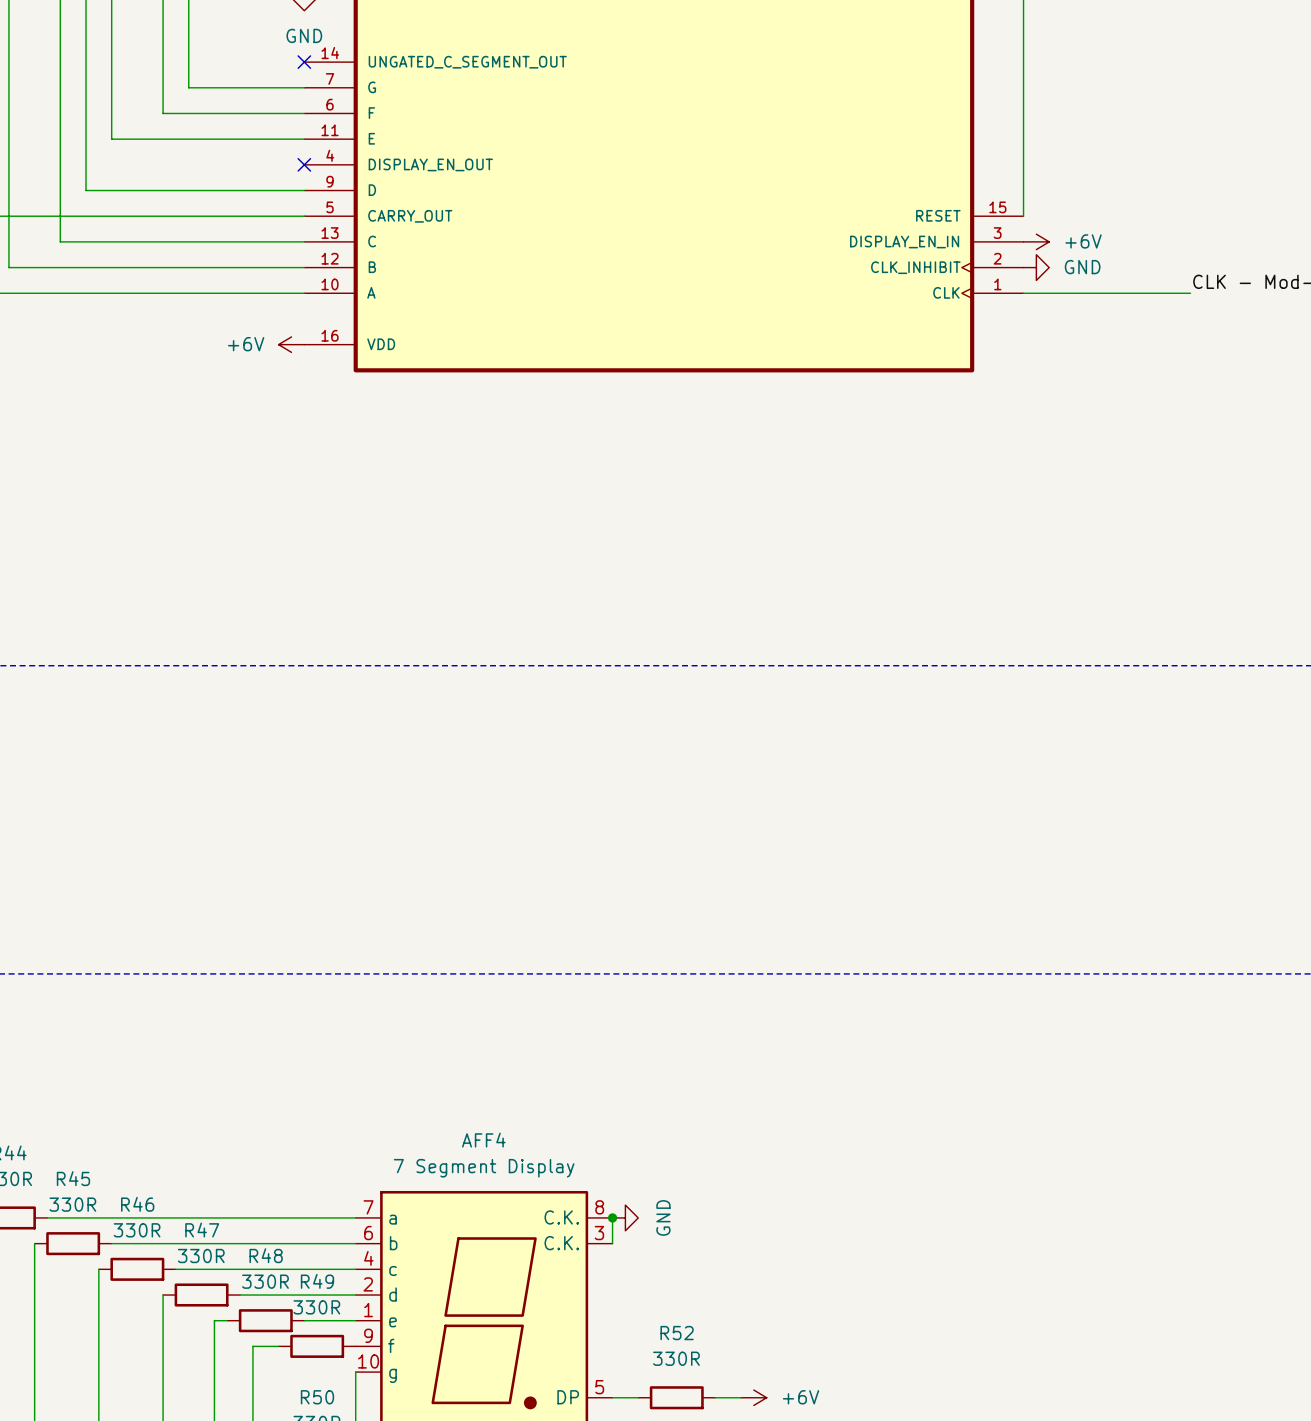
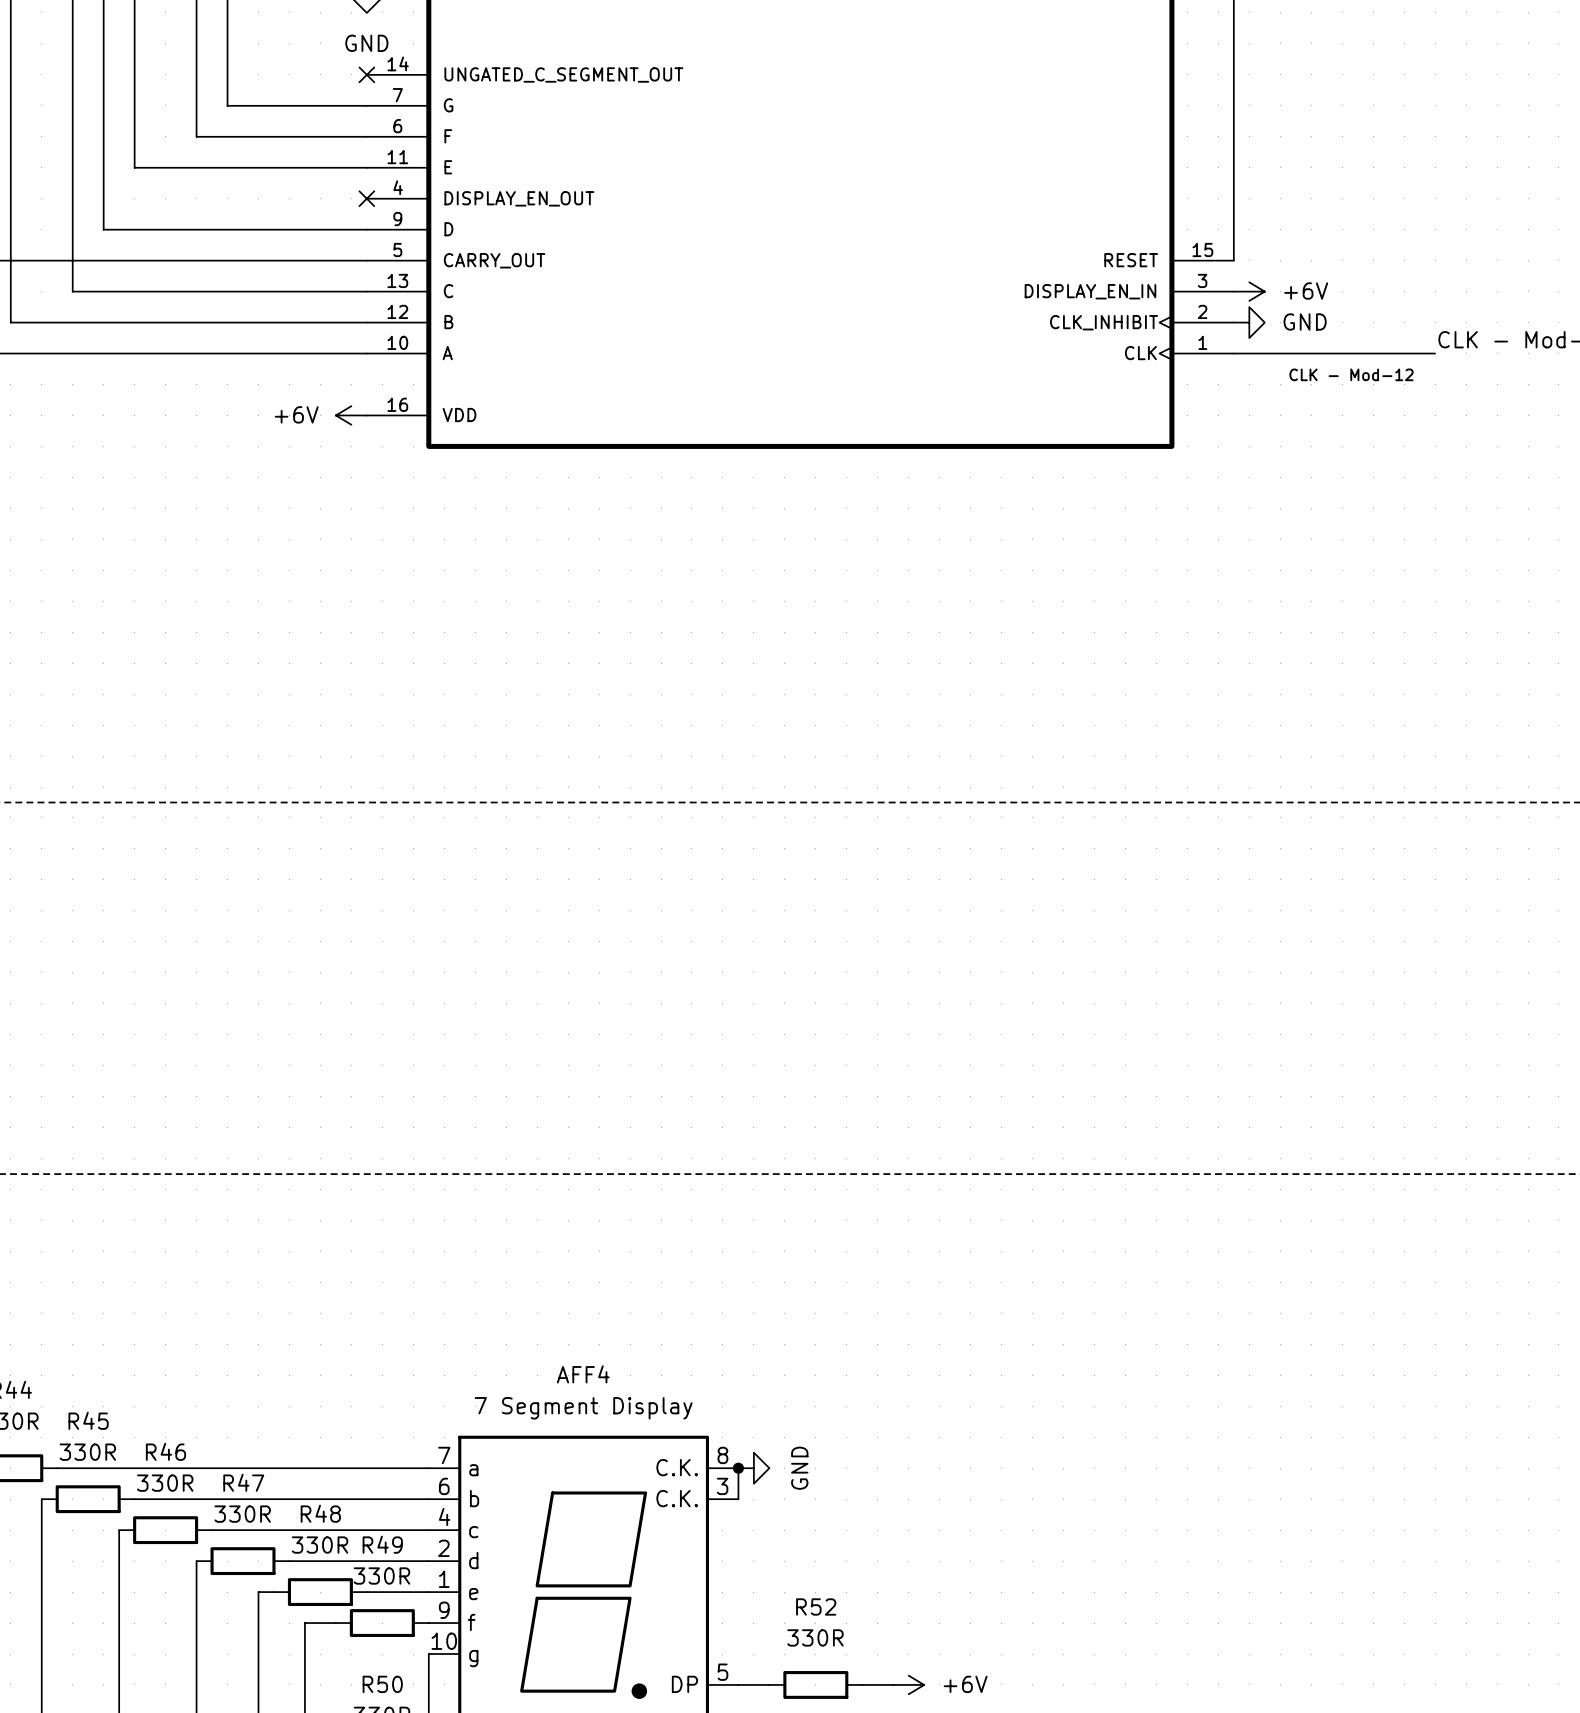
text: none -> CLK - Mod-12 (1351, 374)

